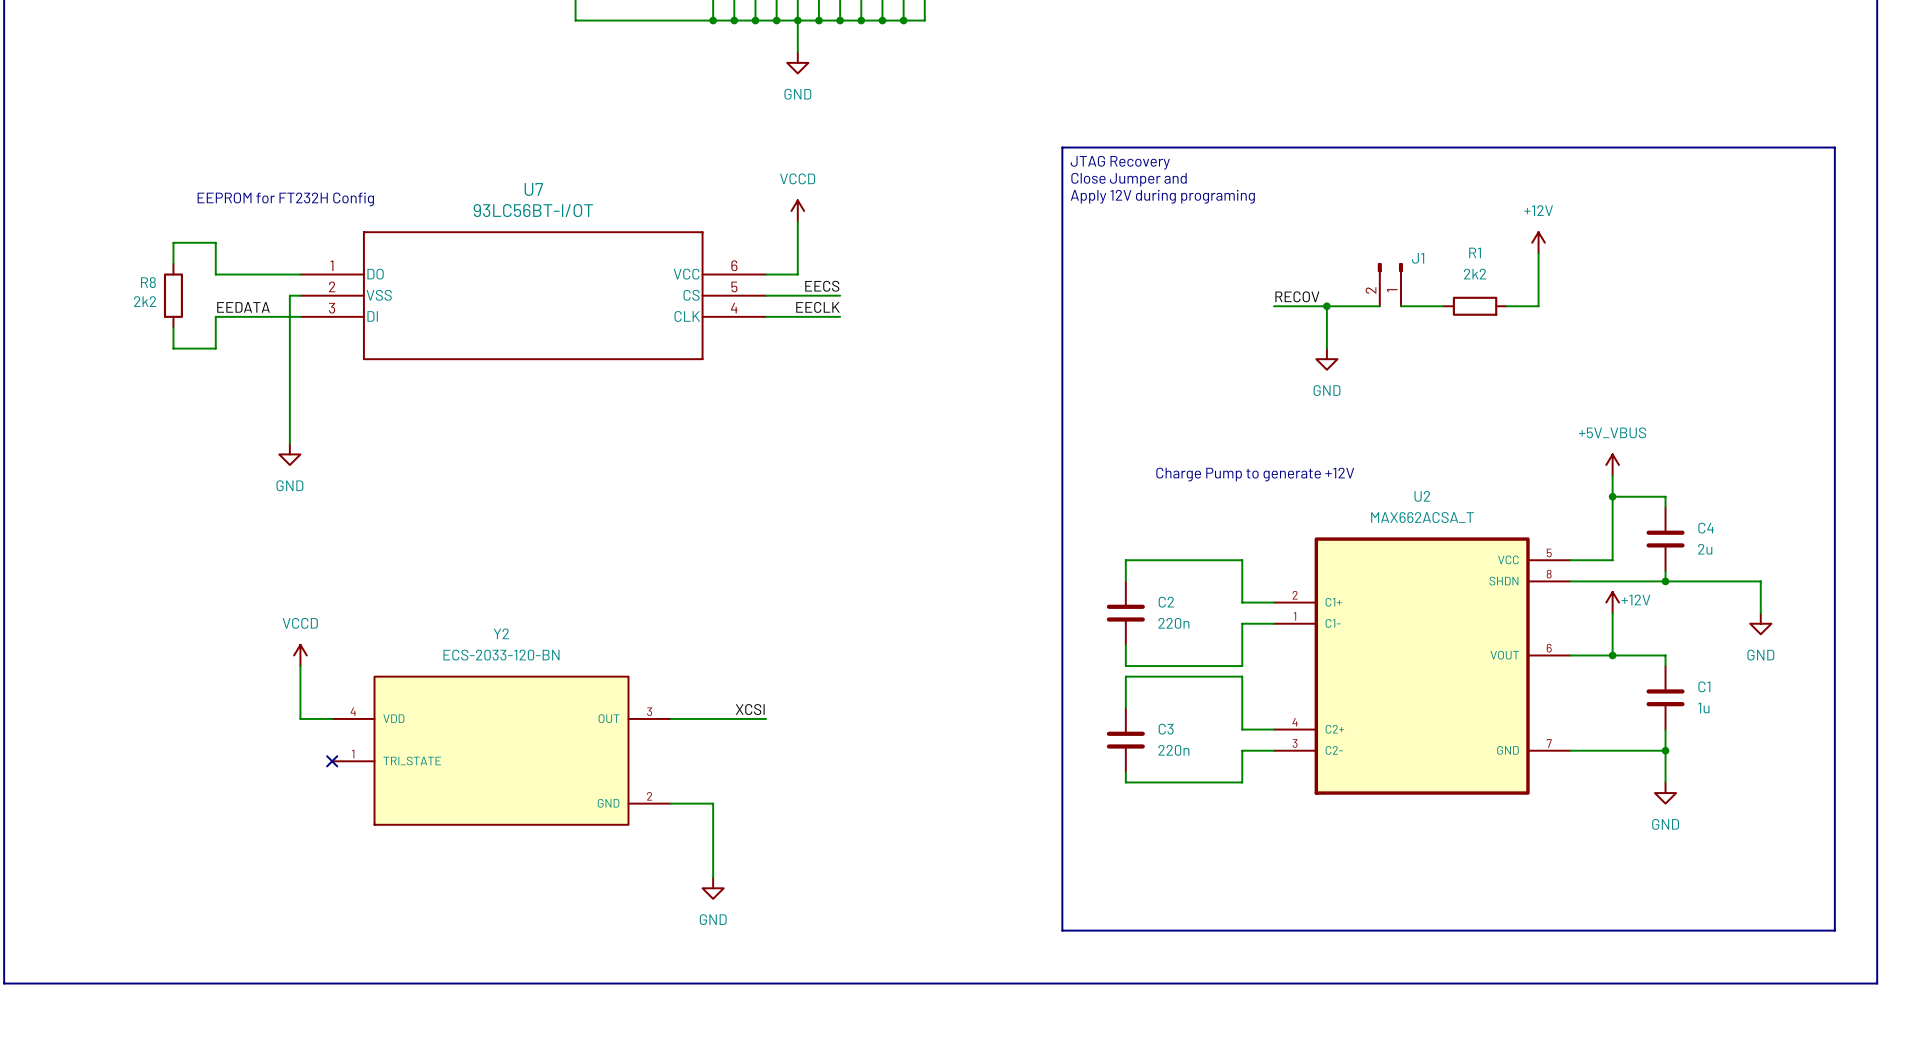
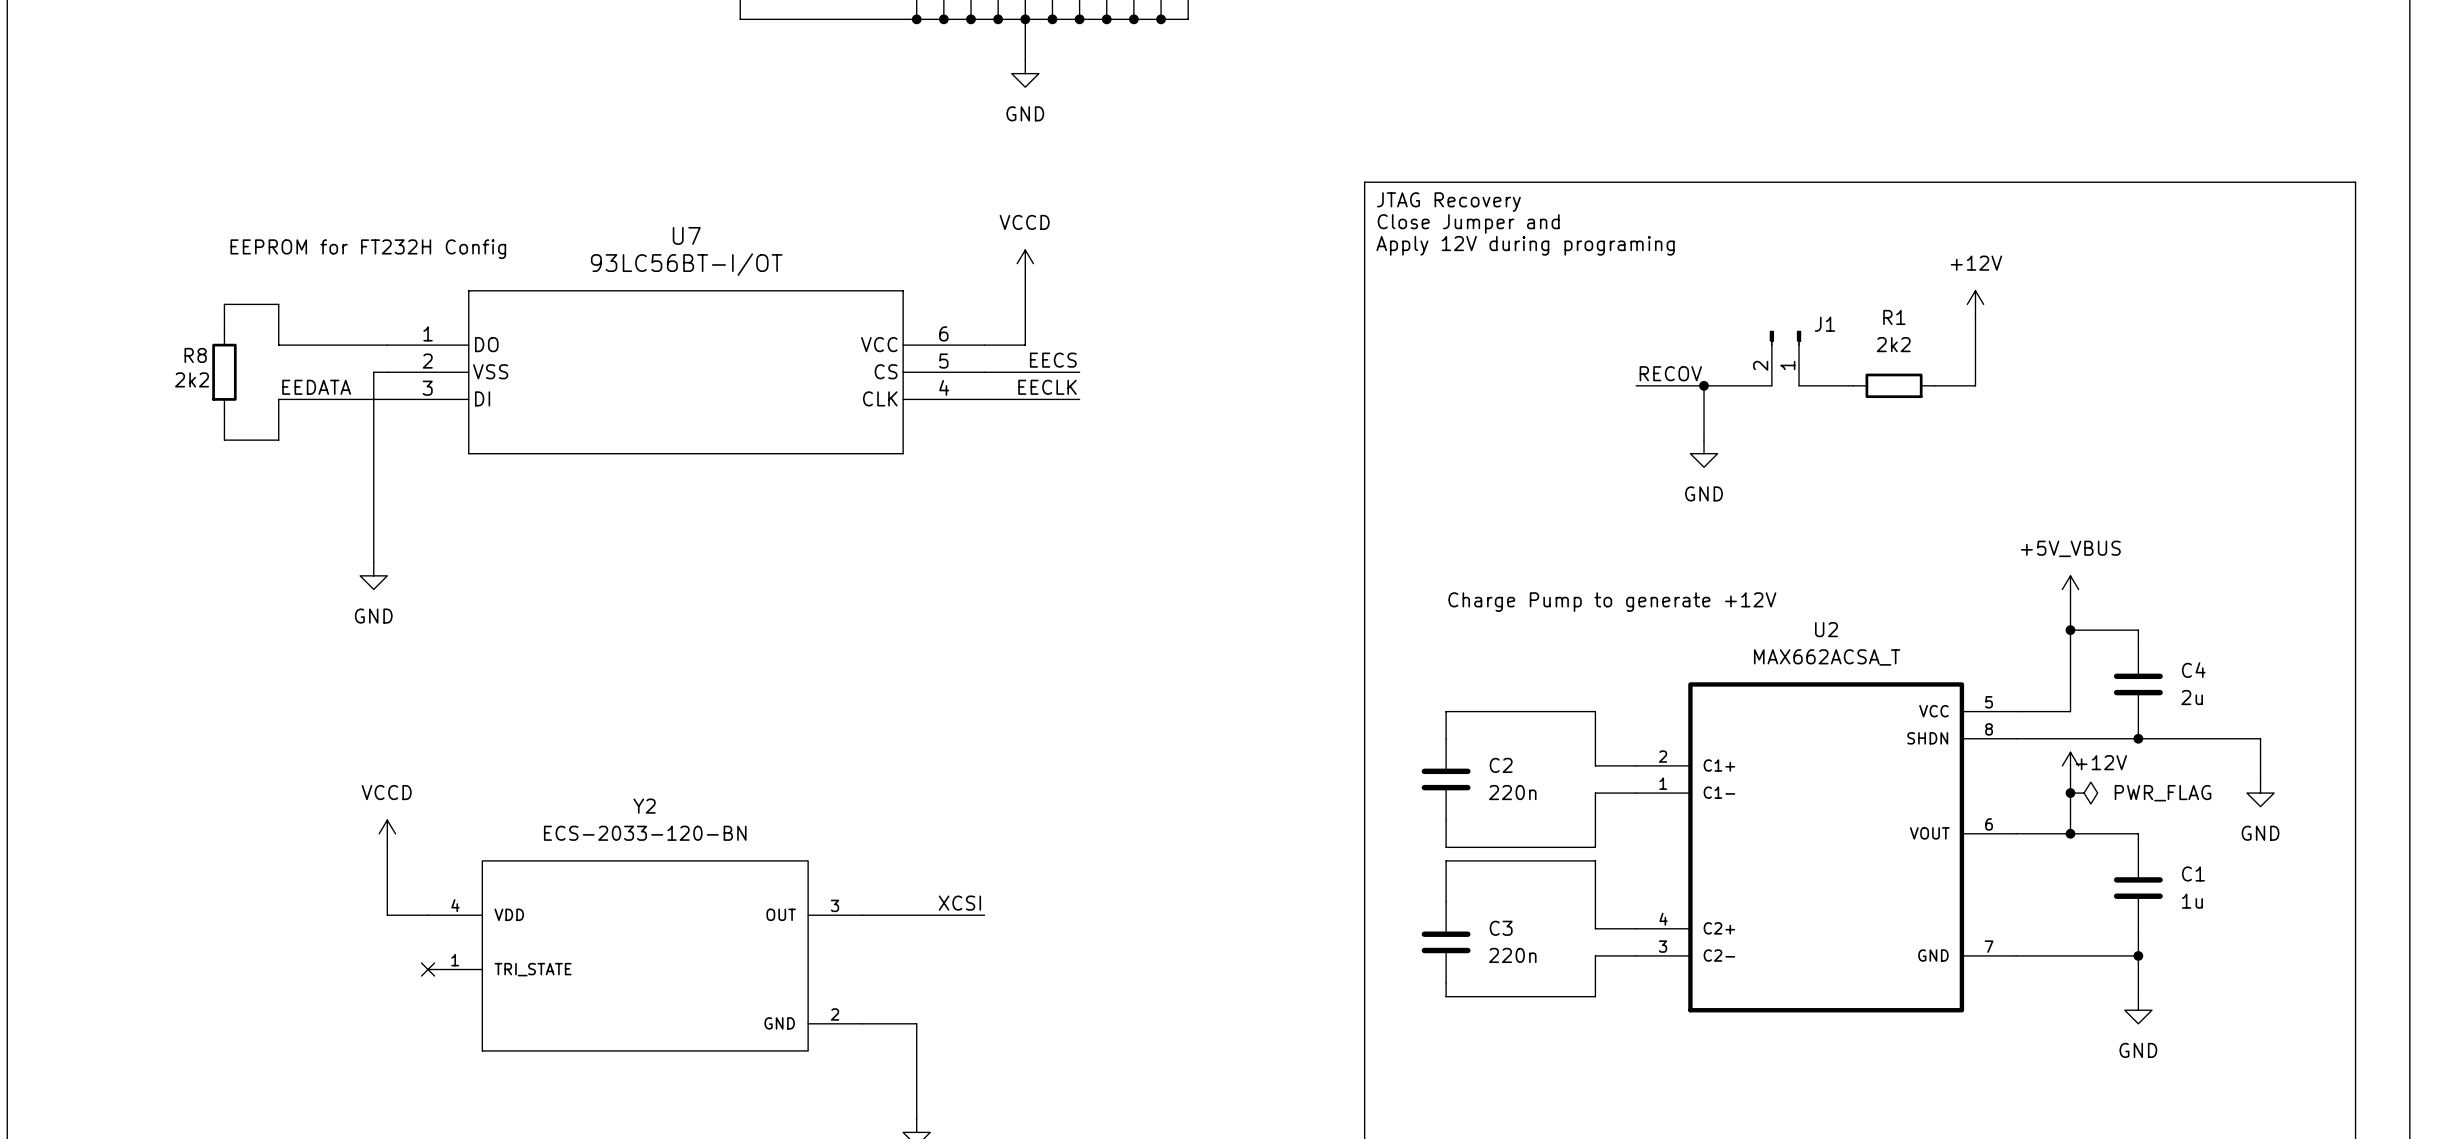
junction: none -> (2070, 793)
power symbol: none -> PWR_FLAG (2084, 793)

